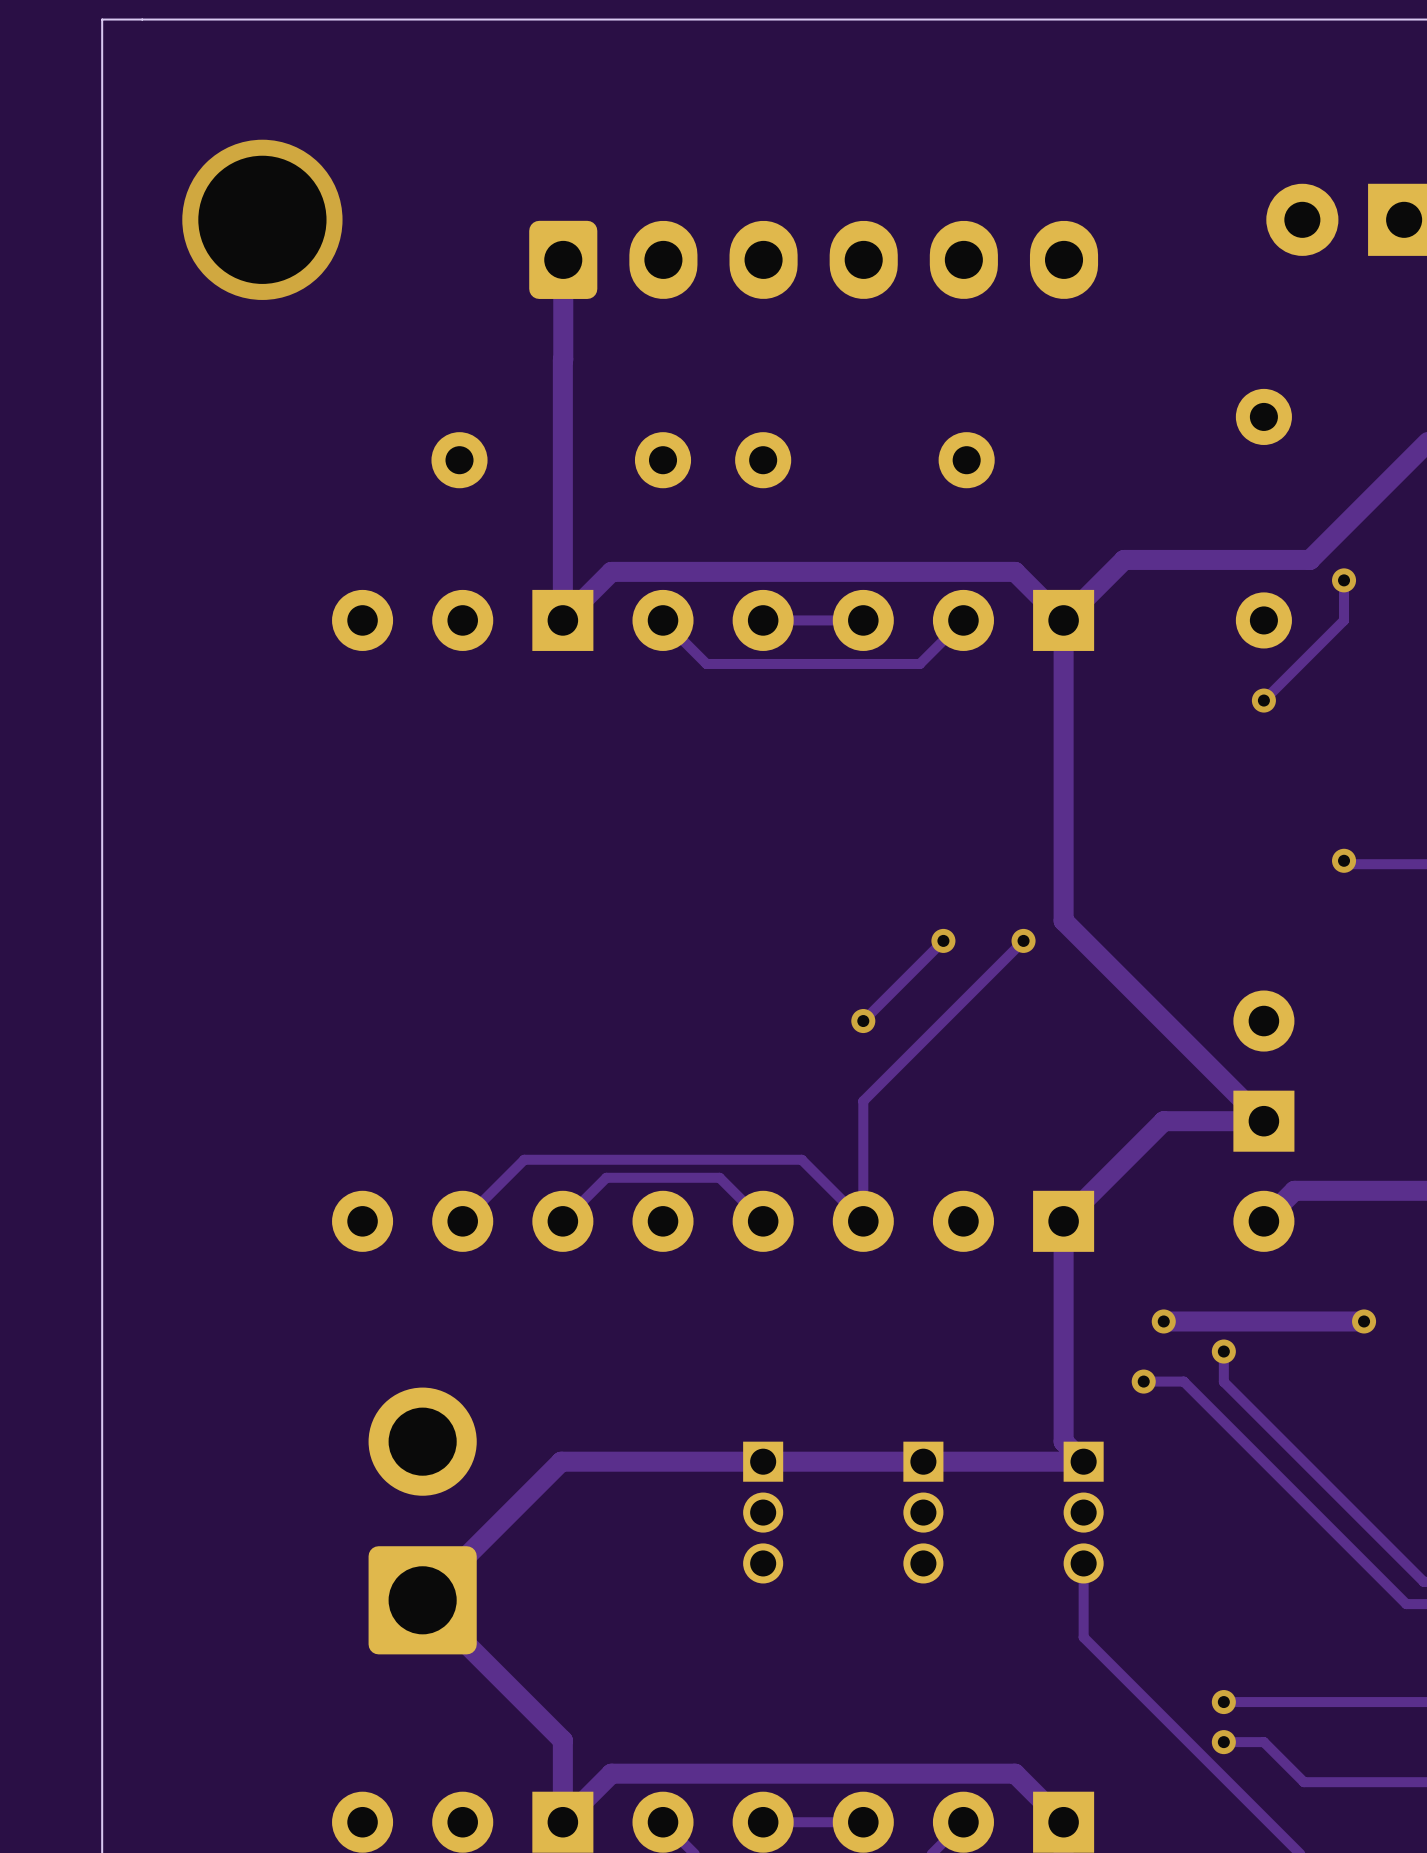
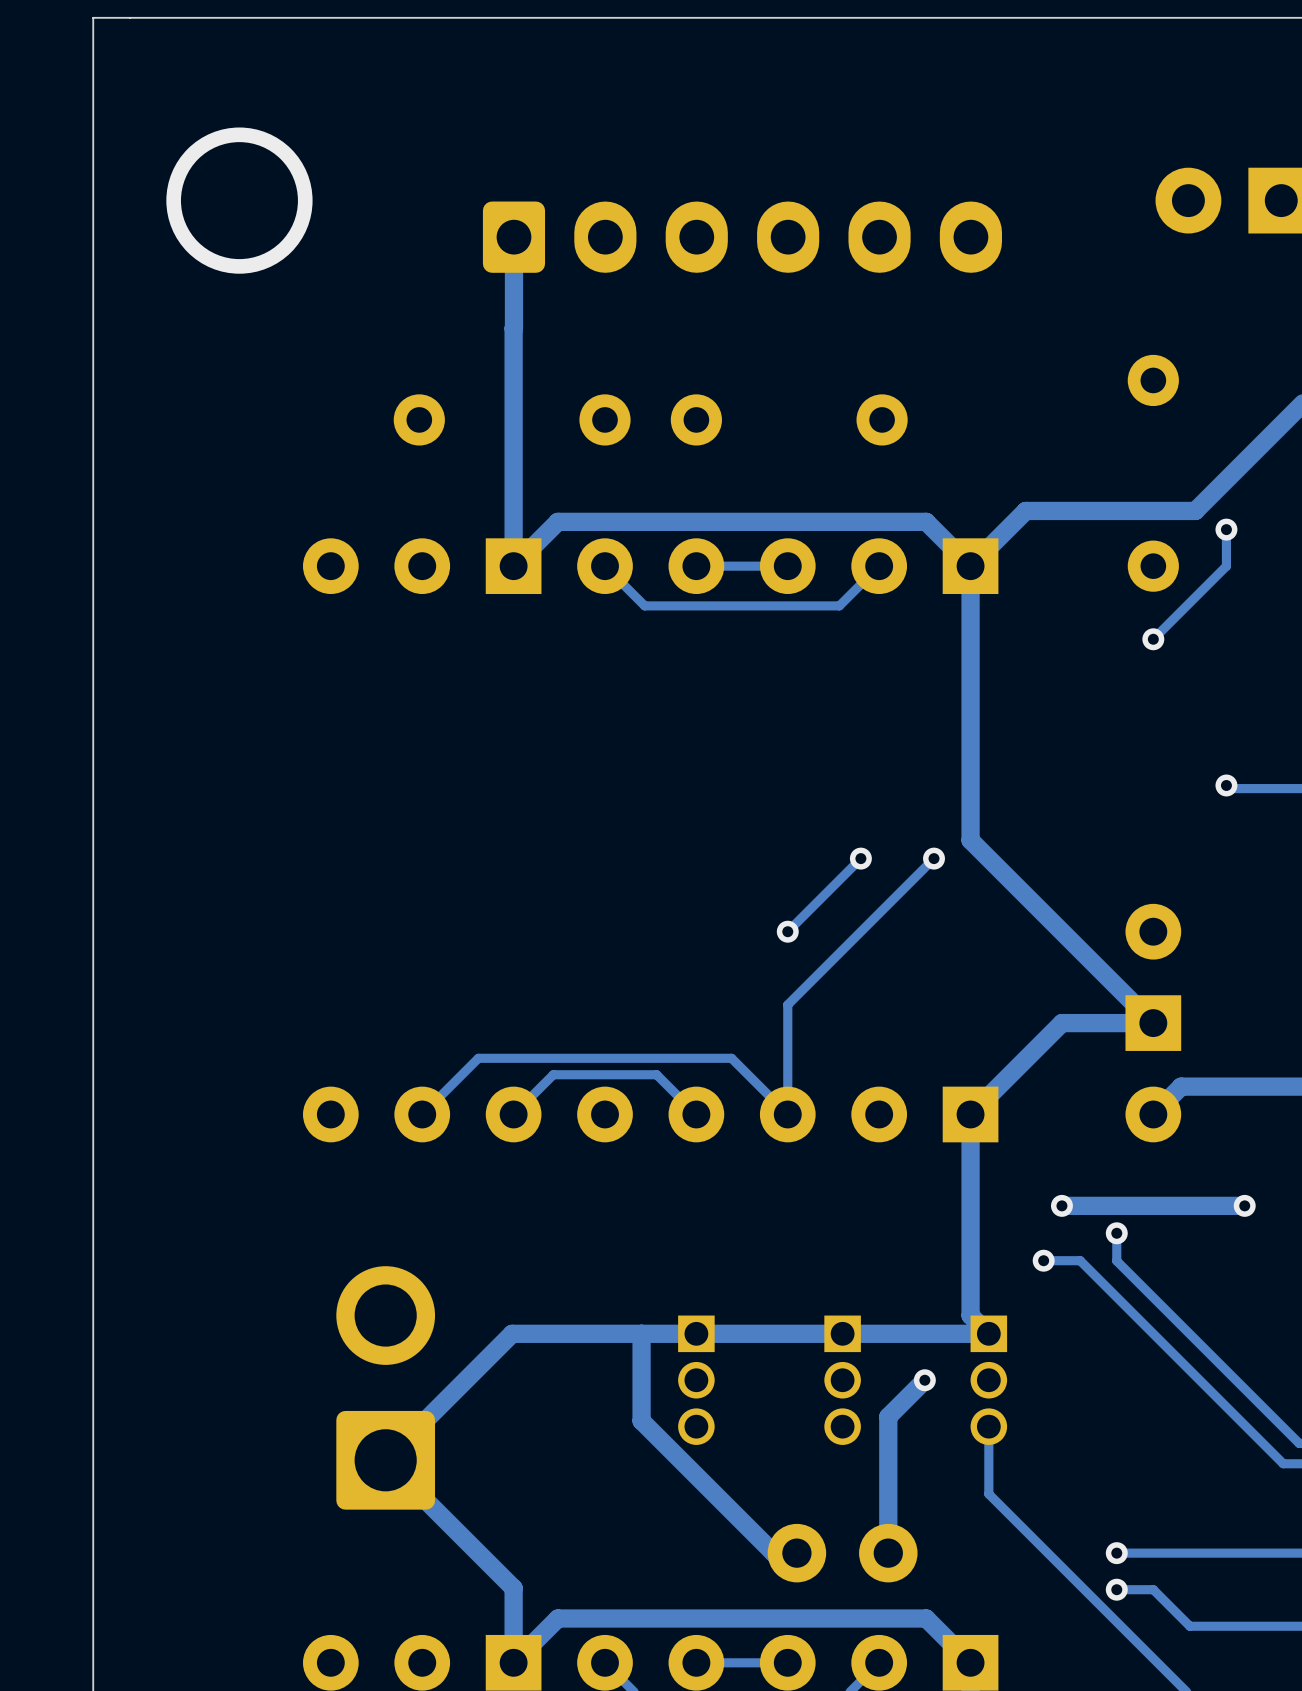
track: none -> (641, 1333) (641, 1420) (773, 1553) (796, 1553)
track: none -> (924, 1380) (888, 1416) (888, 1553)
via: none -> (924, 1380)
part: none -> (842, 1553)

